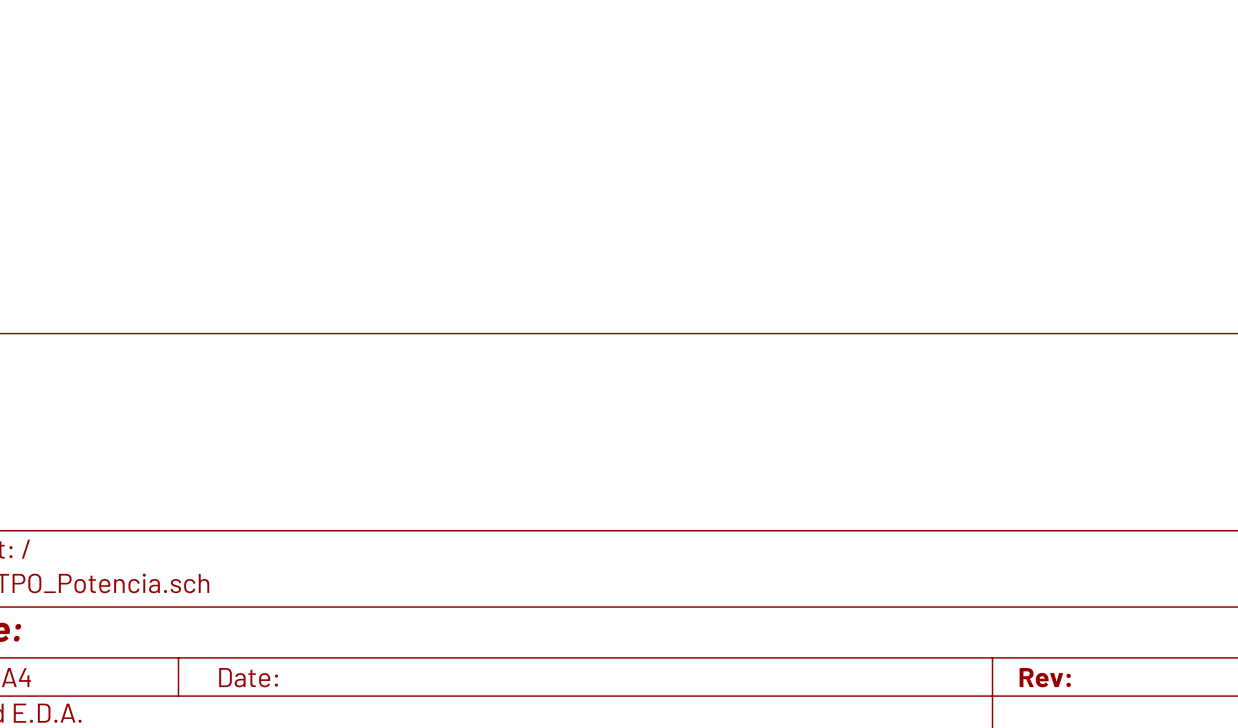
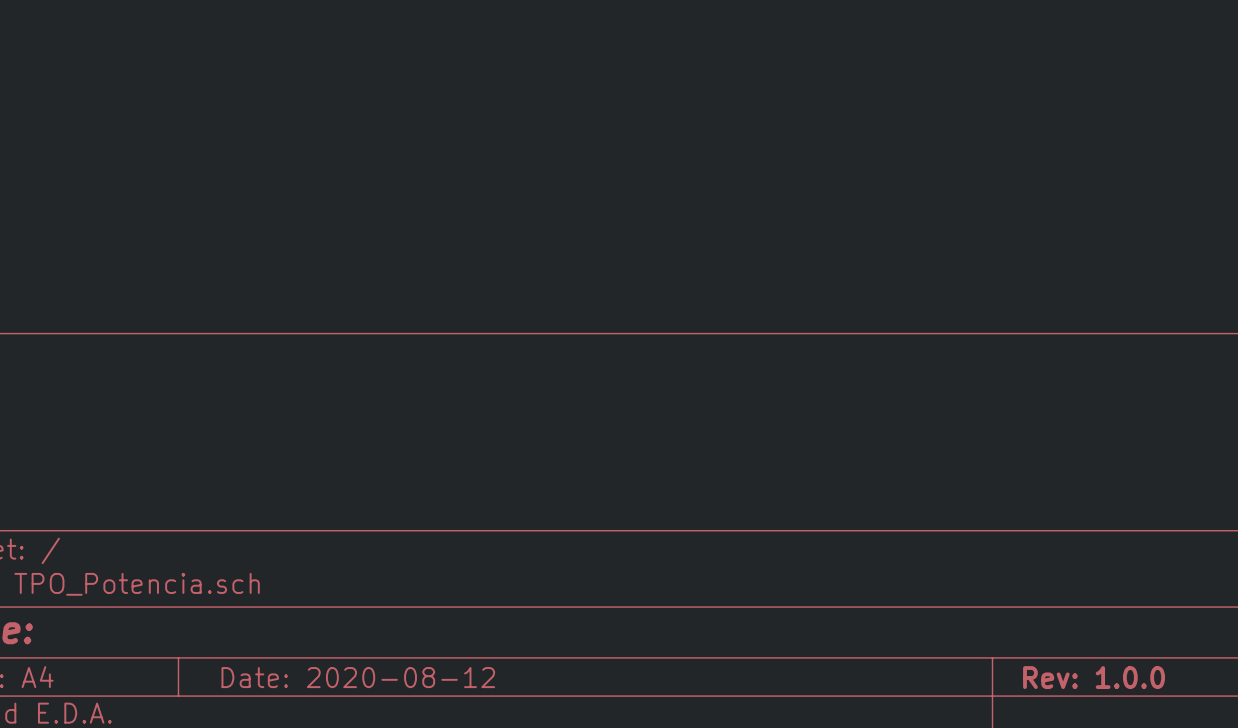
title block: Date: (248, 677) -> Date: 2020-08-12 (358, 677)
title block: Rev: (1045, 677) -> Rev: 1.0.0 (1094, 677)

